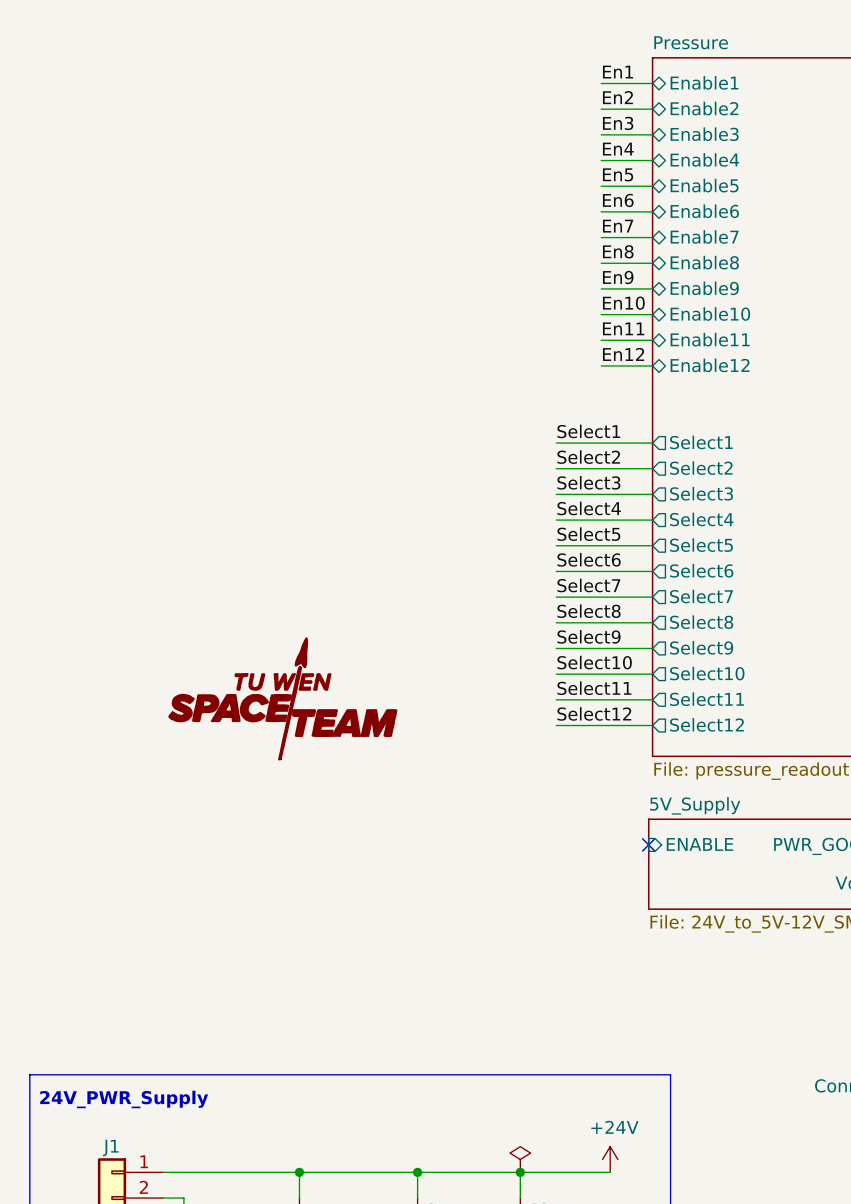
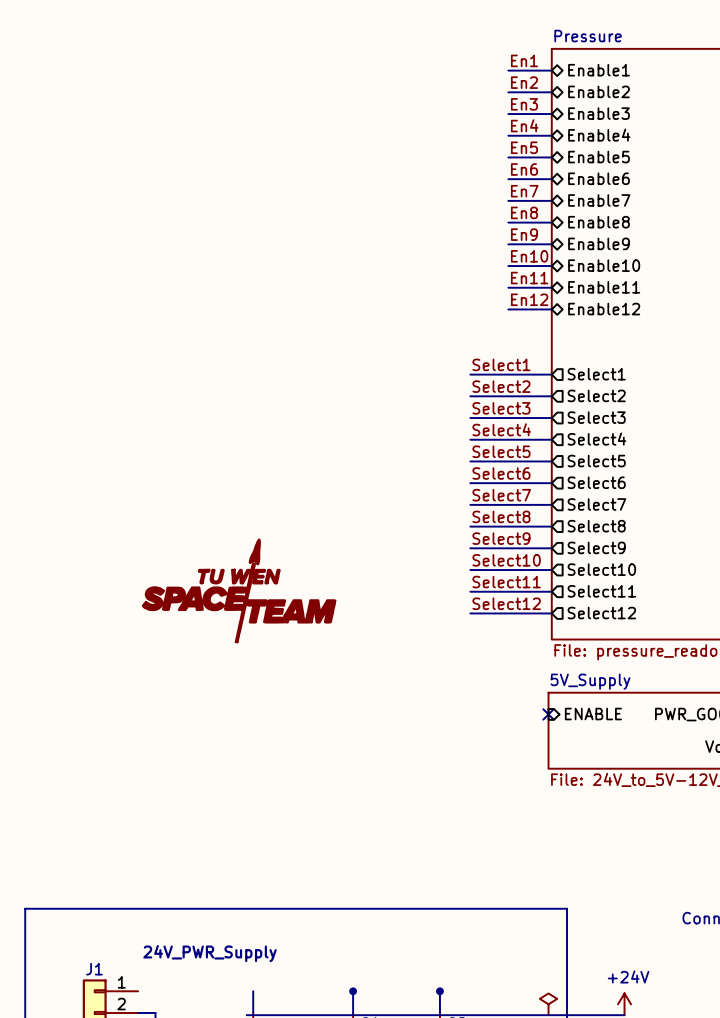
text position: 24V_PWR_Supply (124, 1099) -> 24V_PWR_Supply (210, 953)
power symbol position: (520, 1159) -> (548, 1004)
power symbol position: +24V (610, 1159) -> +24V (624, 1004)
wire: (163, 1172) (610, 1172) -> (246, 1015) (624, 1015)
junction: (299, 1172) -> none

